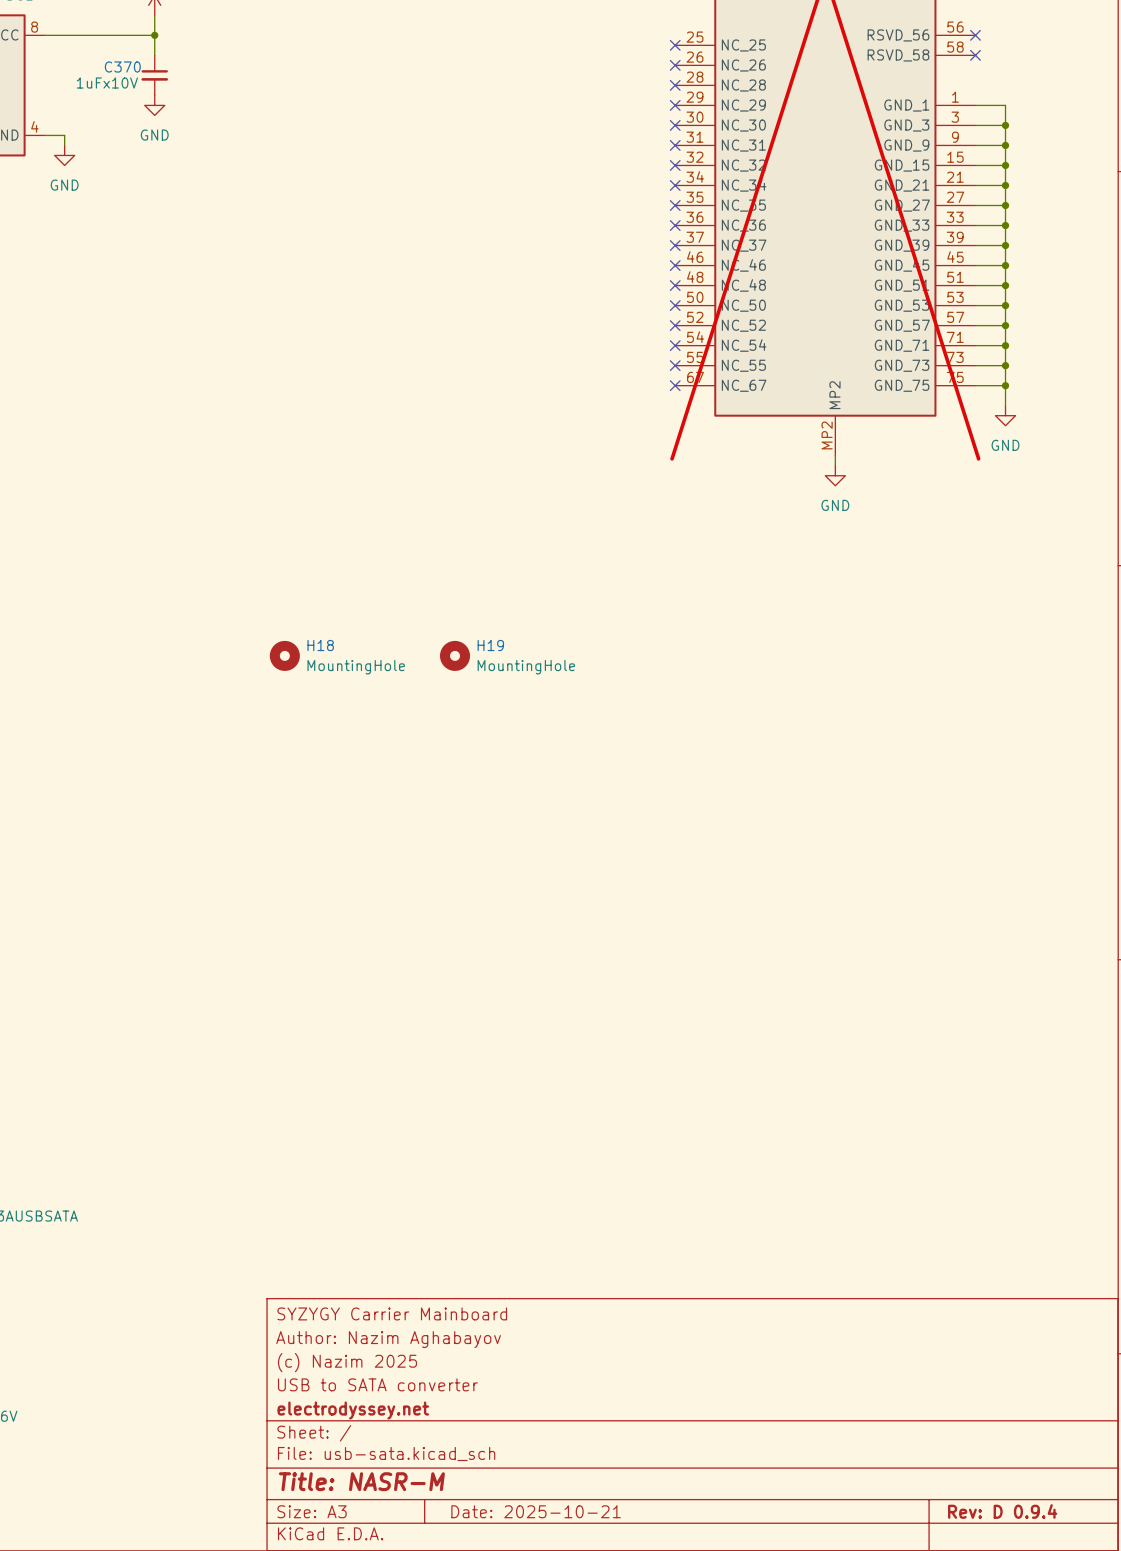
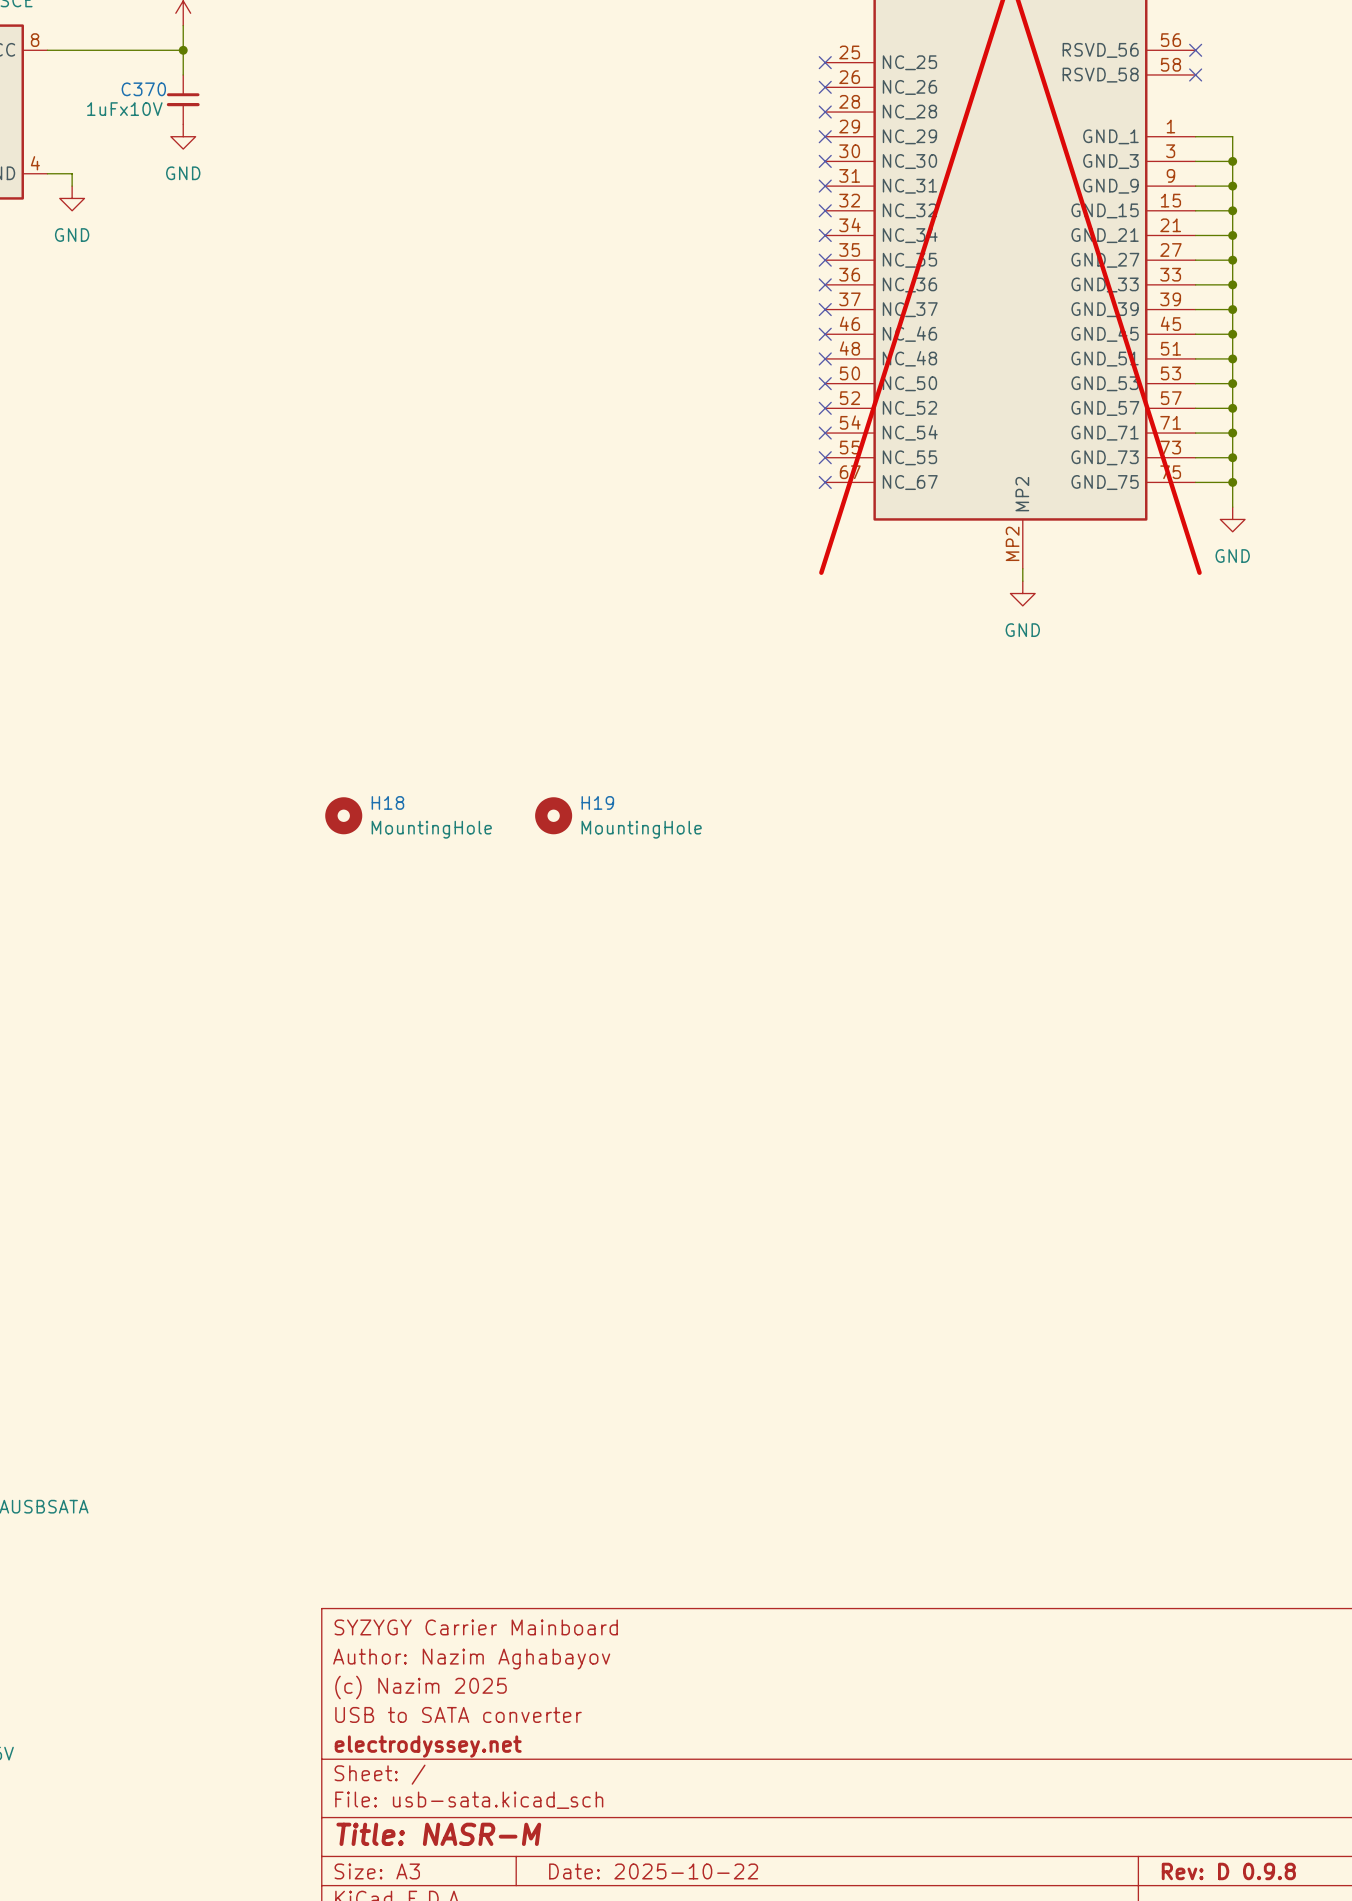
title block: Date: 2025-10-21 (536, 1511) -> Date: 2025-10-22 (653, 1871)
title block: Rev: D 0.9.4 (1002, 1511) -> Rev: D 0.9.8 (1228, 1871)

